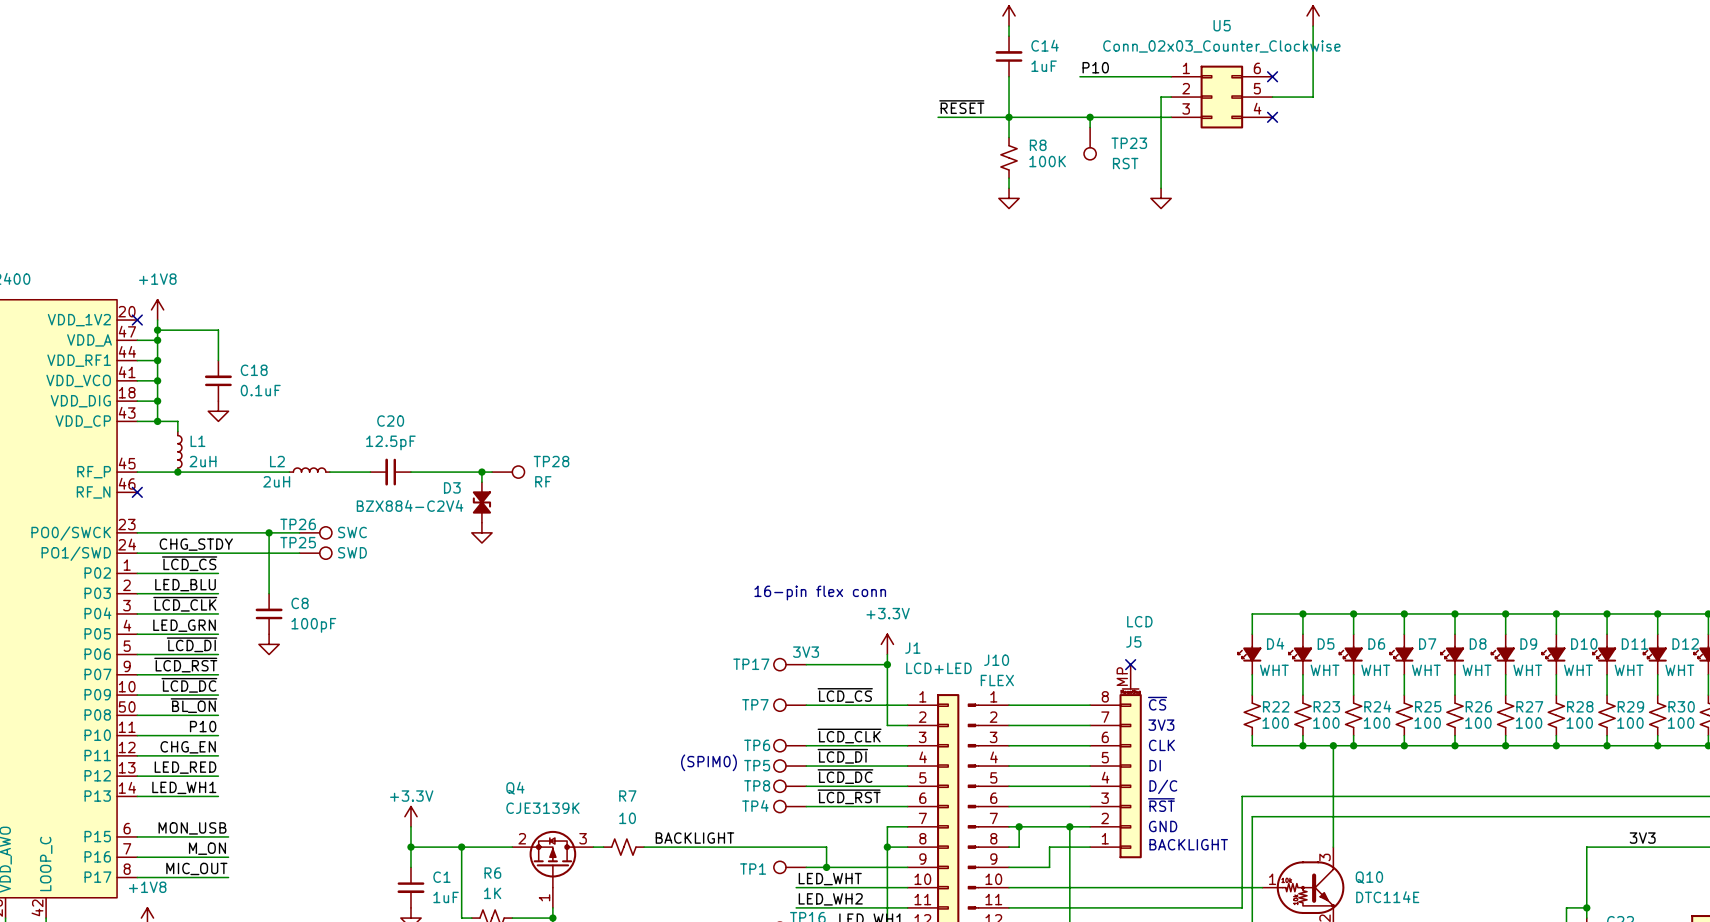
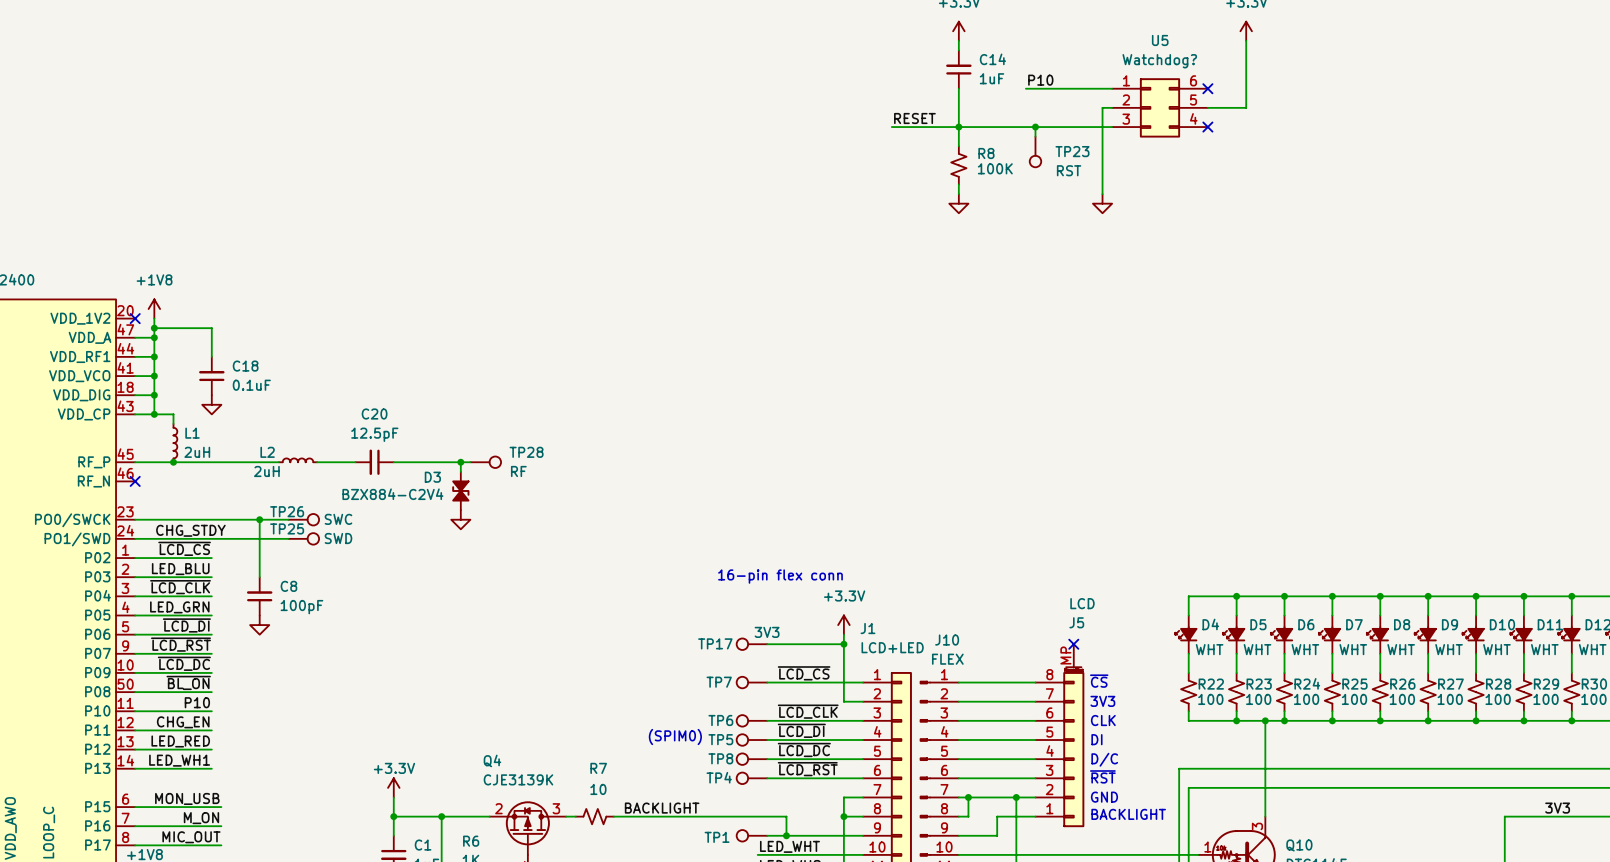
U5 value: Conn_02x03_Counter_Clockwise (1221, 46) -> Watchdog? (1159, 61)
label: ~{RESET} (961, 107) -> RESET (914, 118)

